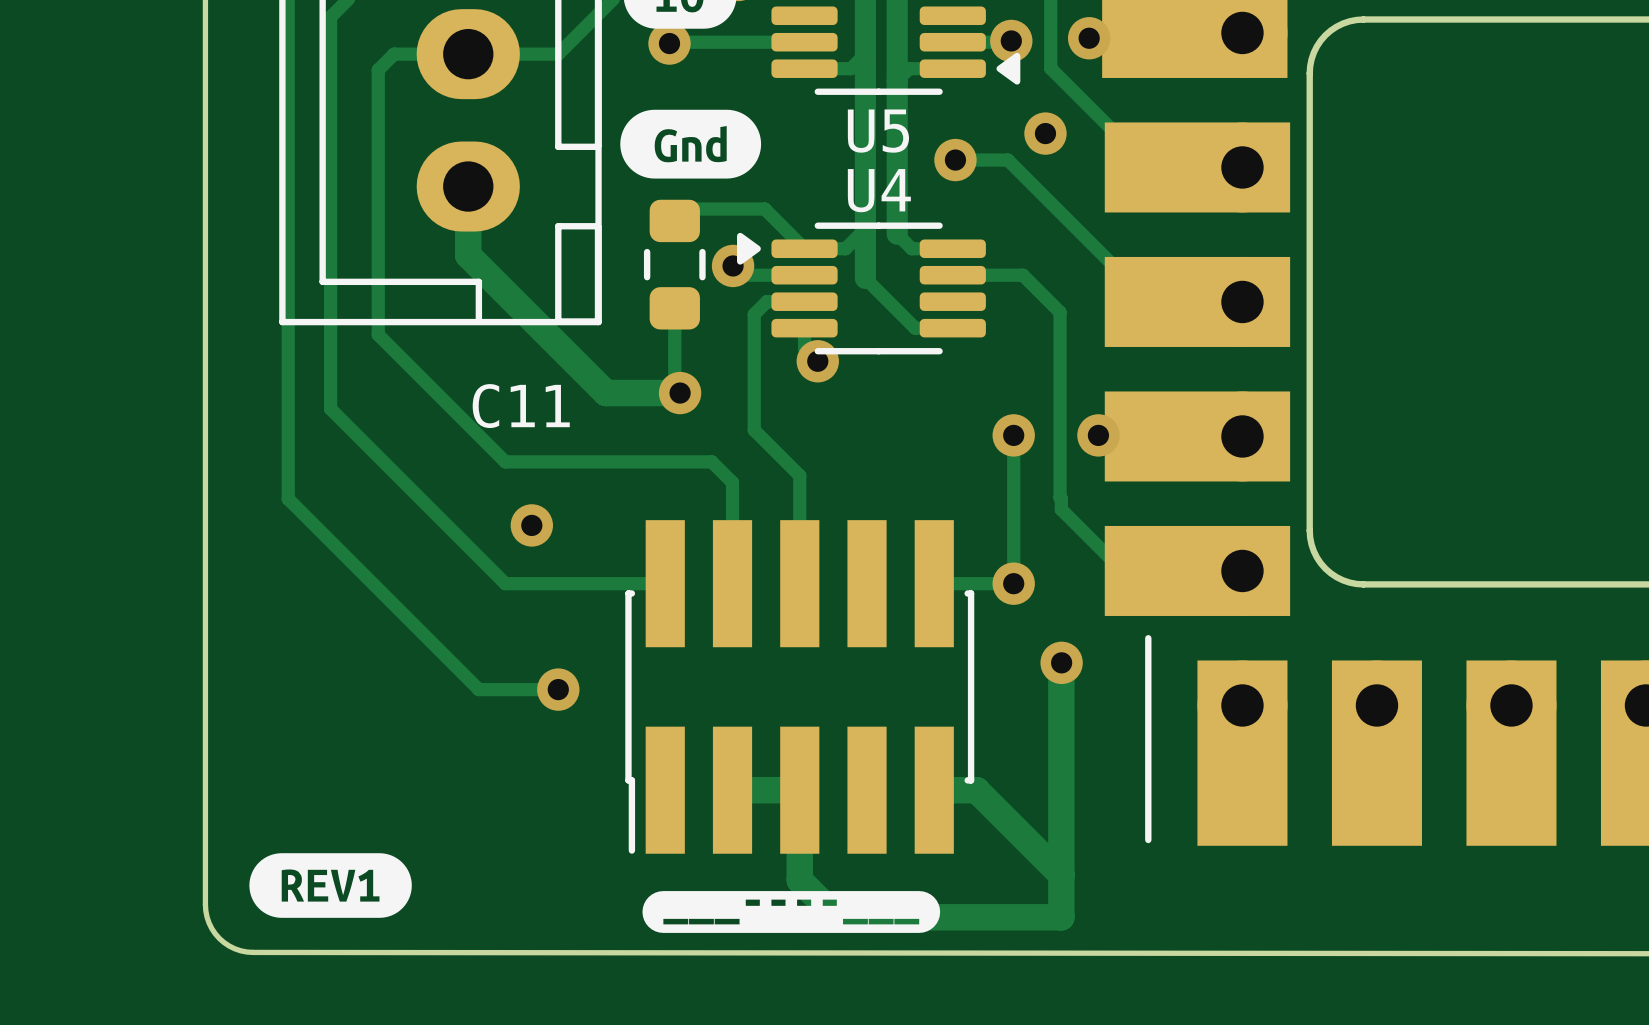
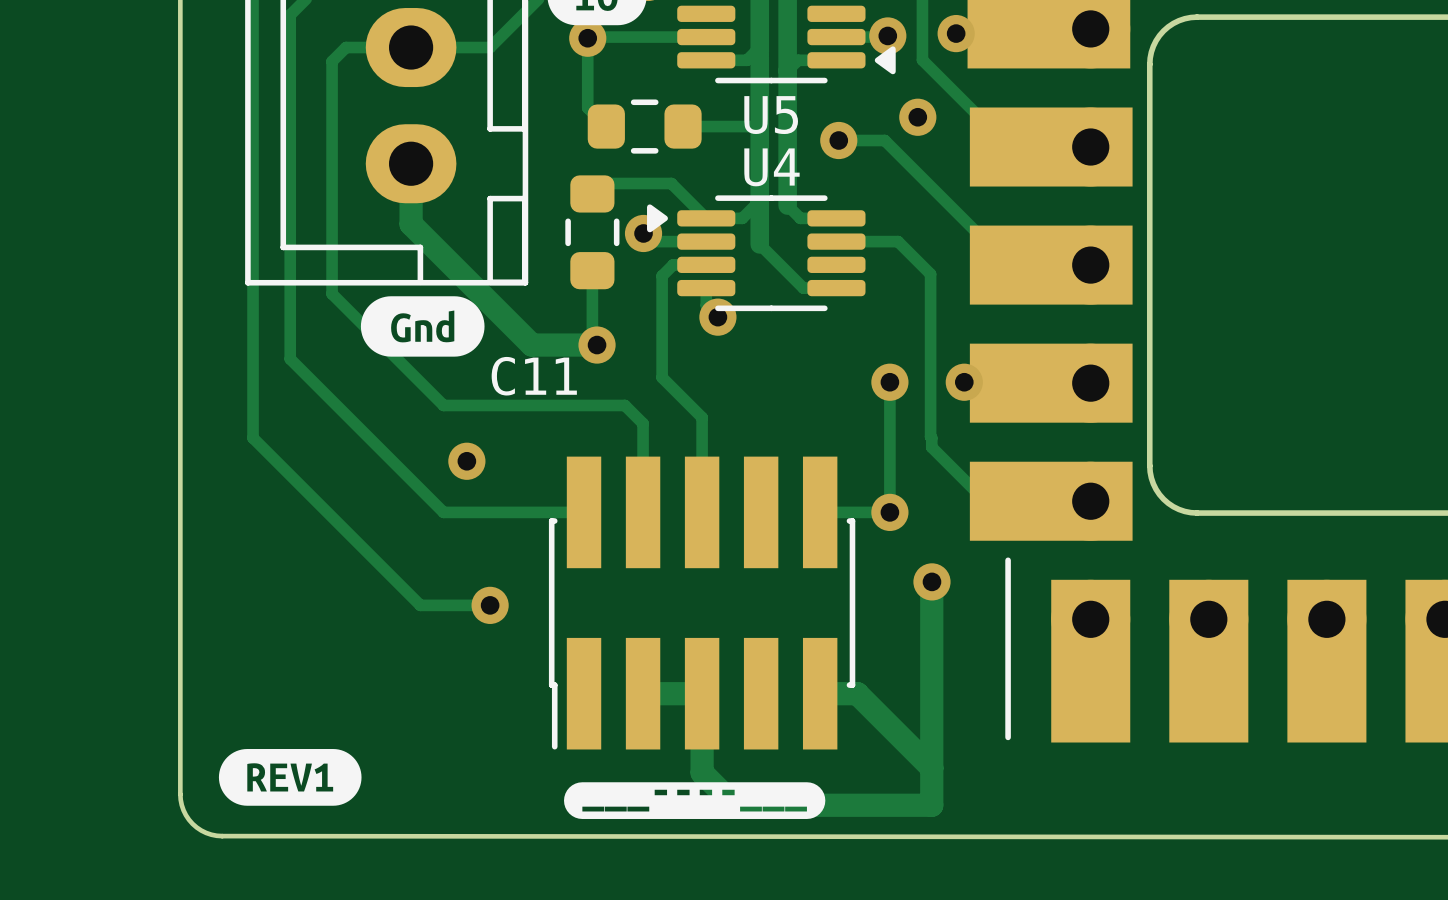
track: none -> (587, 38) (587, 107) (606, 126)
track: none -> (759, 124) (757, 126) (683, 126)
drawing position: (690, 144) -> (422, 326)
part: none -> (644, 126)
C11 name position: C11 (521, 406) -> C11 (534, 376)

